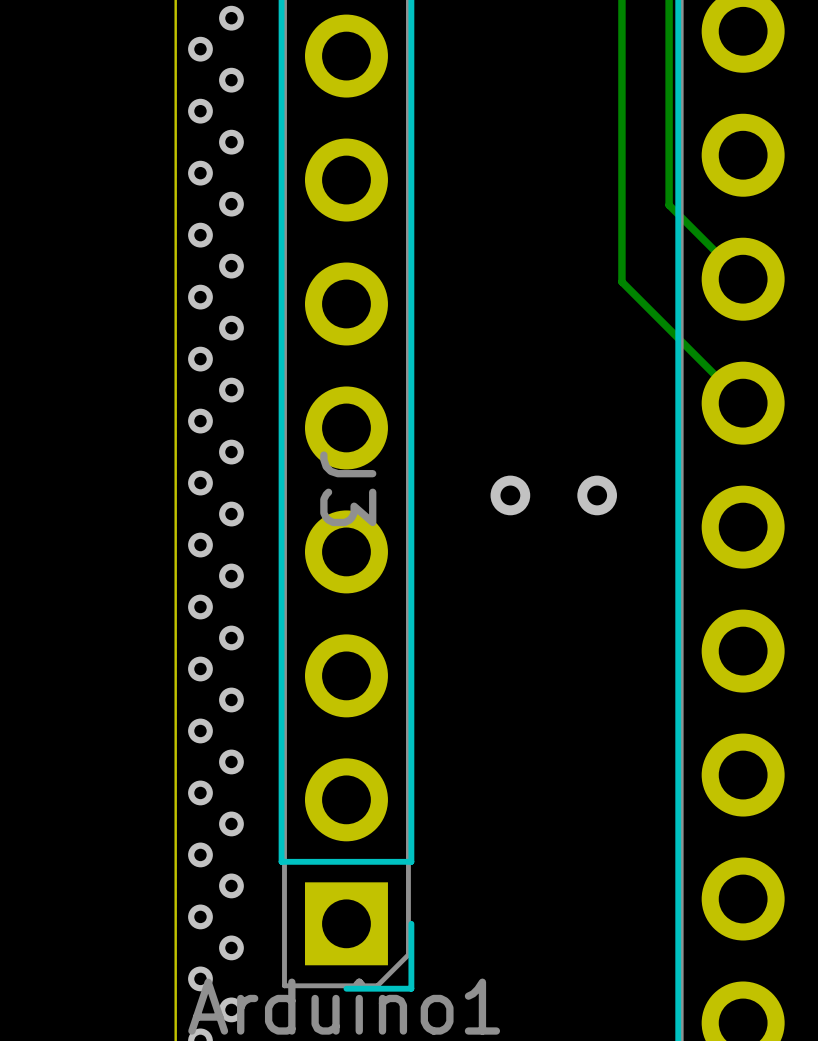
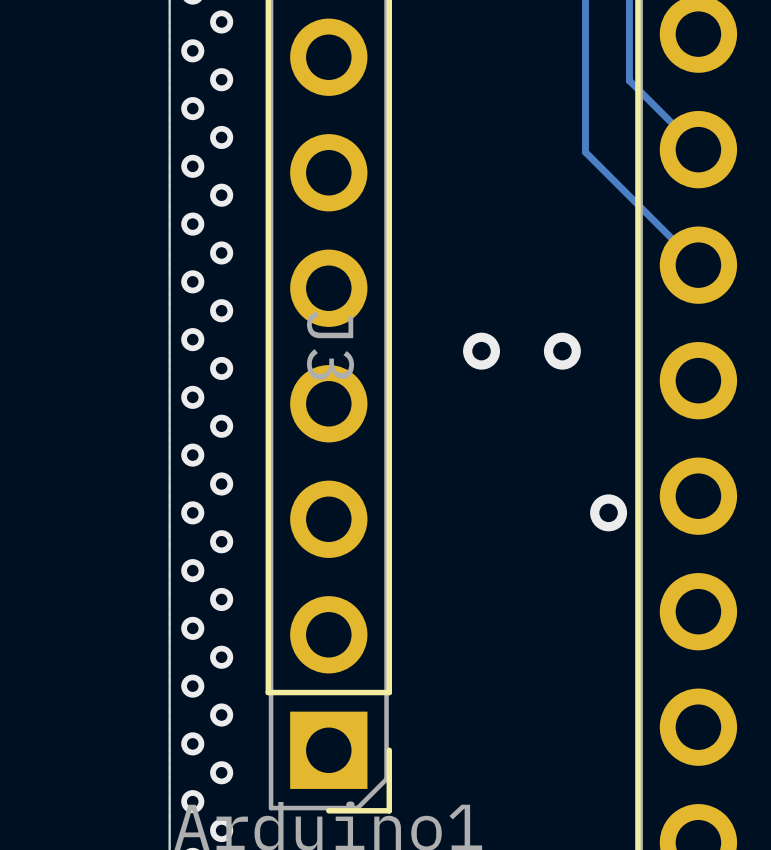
via: none -> (608, 512)

